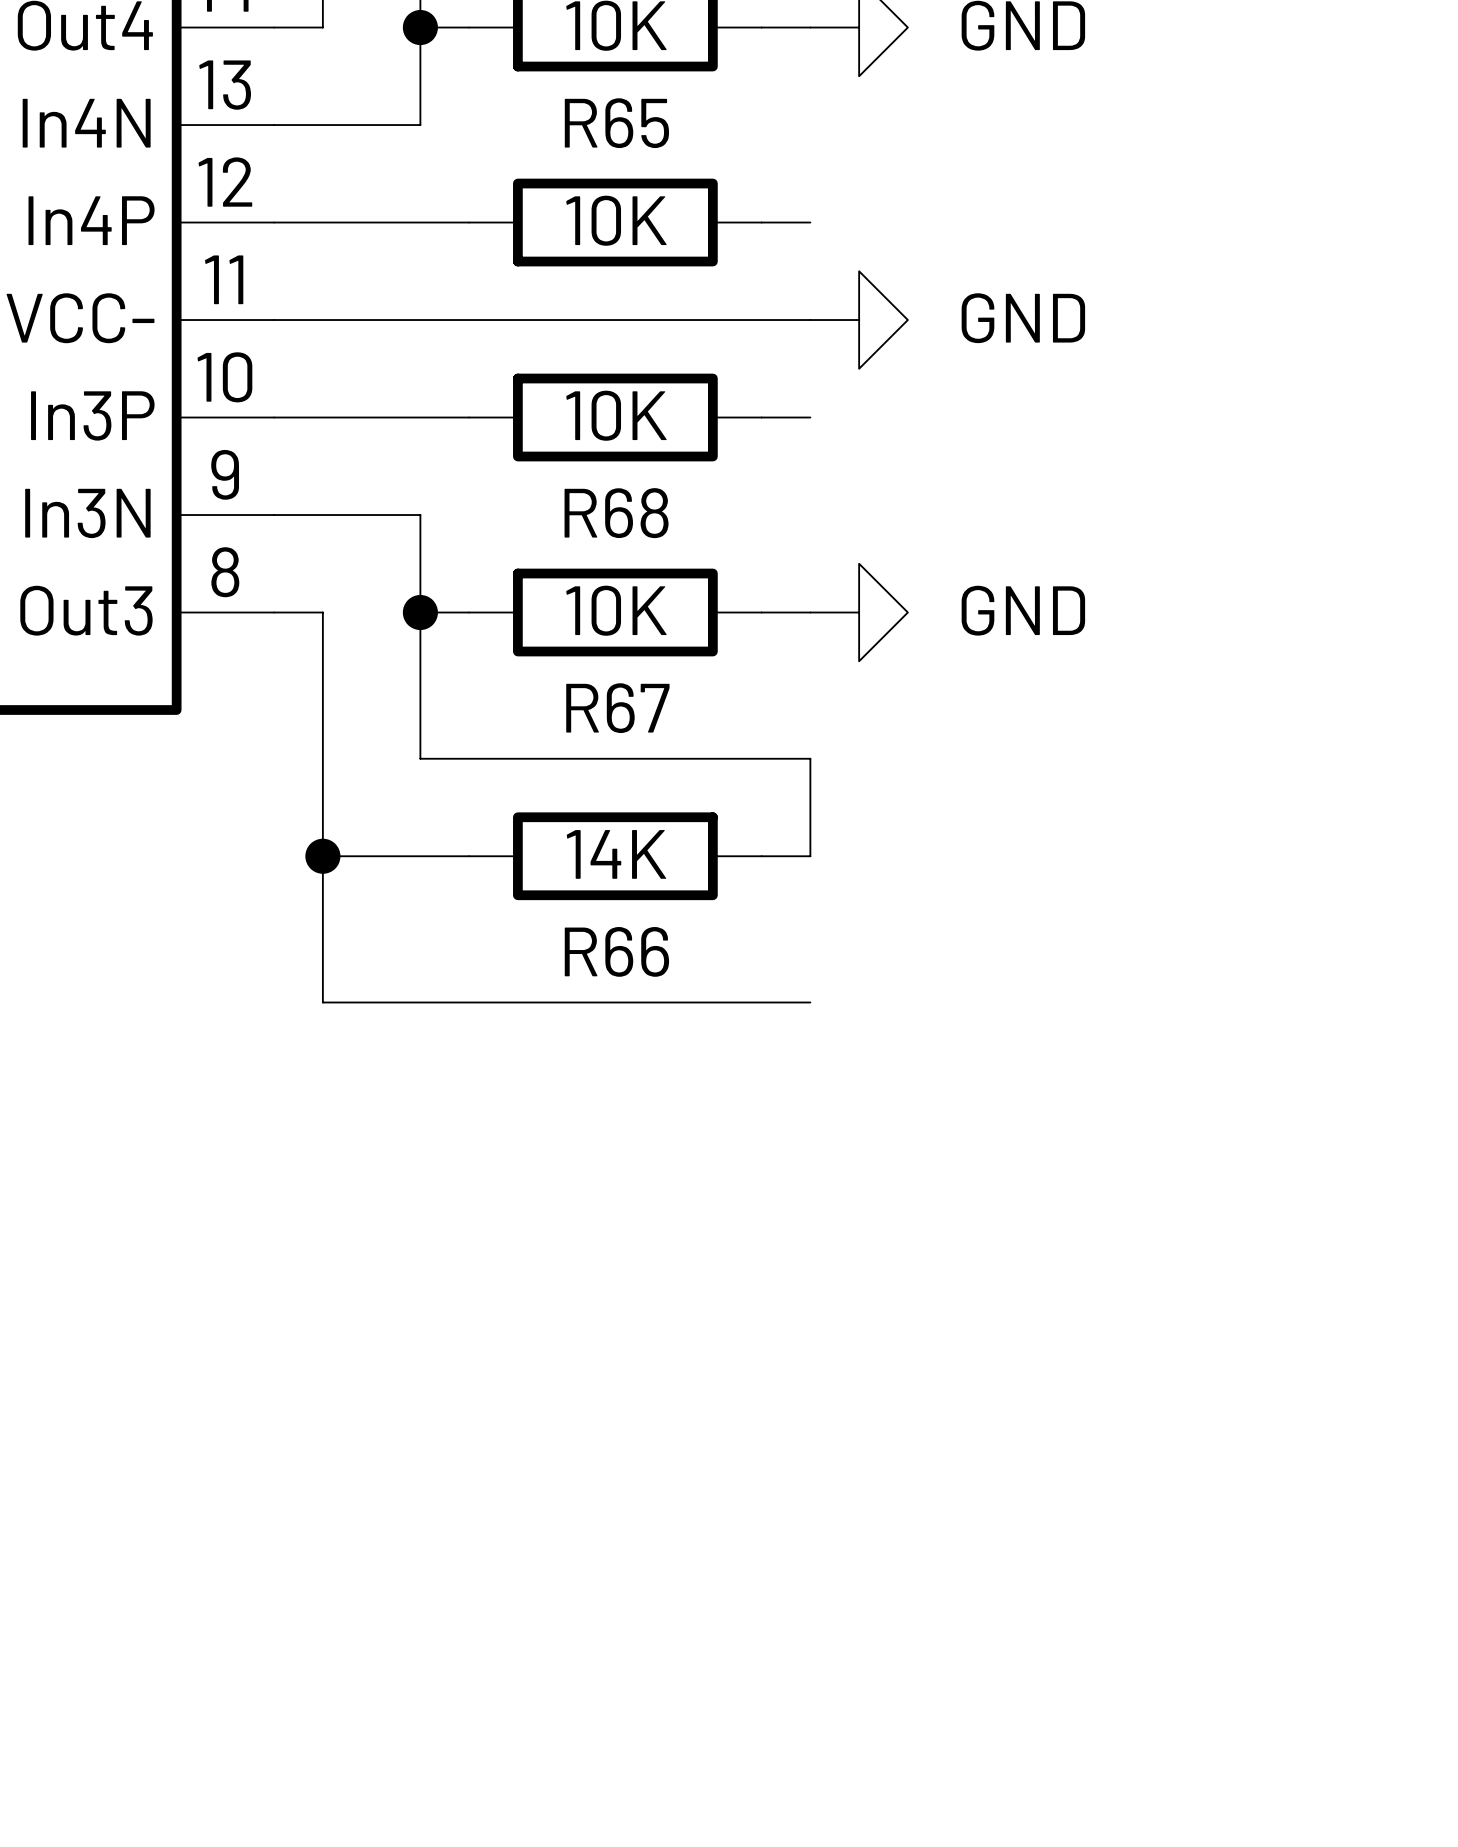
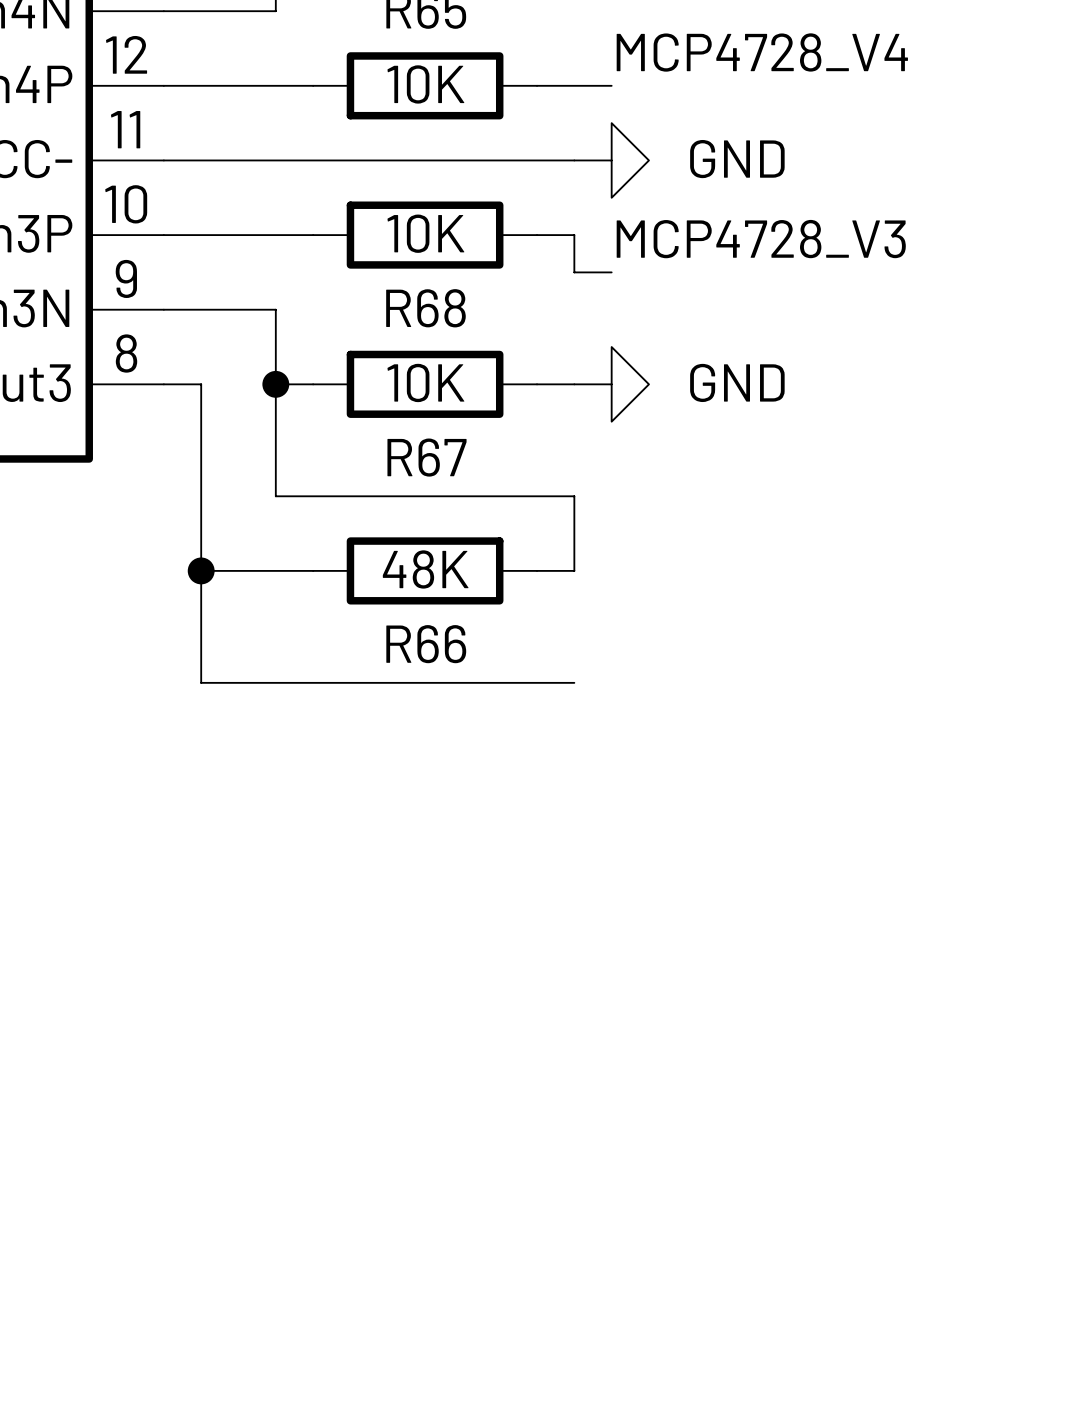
label: none -> MCP4728_V4 (762, 52)
wire: none -> (574, 85) (611, 85)
wire: none -> (574, 235) (574, 272) (611, 272)
label: none -> MCP4728_V3 (761, 239)
R66 value: 14K (616, 854) -> 48K (425, 569)

